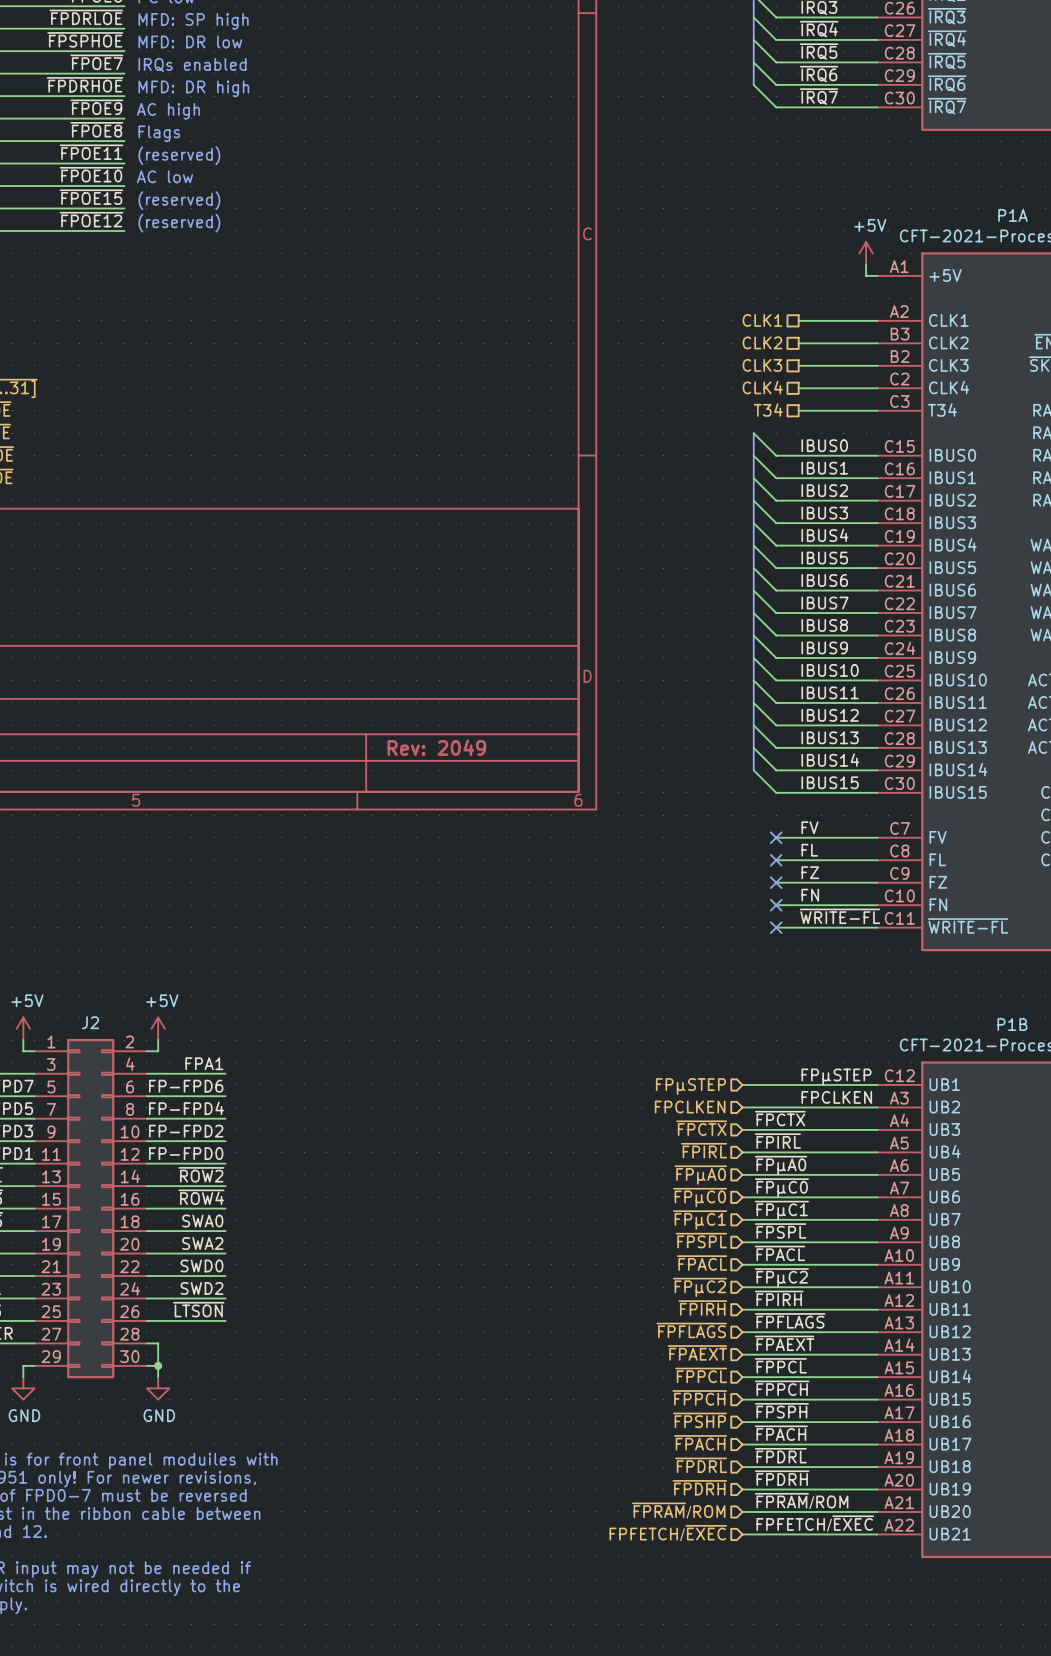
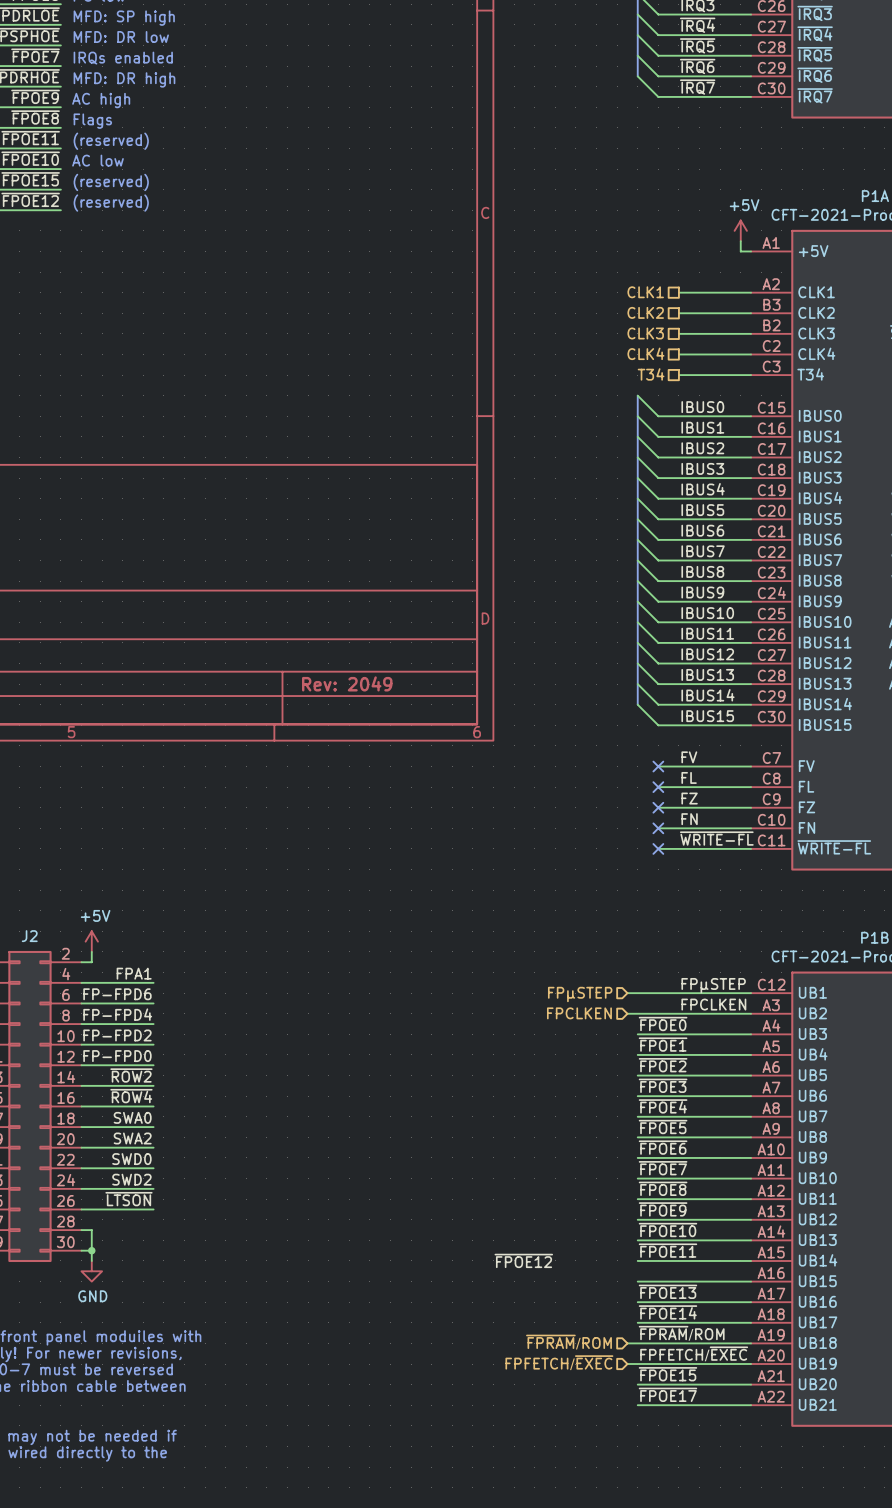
label: ~{FPCTX} (780, 1118) -> ~{FPOE0} (663, 1023)
hierarchical label: ~{FPCTX} (701, 1128) -> none
wire: (742, 1129) (753, 1129) -> none
label: ~{FPIRL} (777, 1141) -> ~{FPOE1} (663, 1044)
hierarchical label: ~{FPIRL} (704, 1150) -> none
wire: (742, 1152) (753, 1152) -> none
label: ~{FPµA0} (781, 1165) -> ~{FPOE2} (663, 1065)
wire: (742, 1174) (753, 1174) -> none
hierarchical label: ~{FPµA0} (700, 1175) -> none
label: ~{FPµC0} (781, 1187) -> ~{FPOE3} (663, 1085)
hierarchical label: ~{FPµC0} (700, 1197) -> none
wire: (742, 1197) (753, 1197) -> none
label: ~{FPµC1} (781, 1210) -> ~{FPOE4} (663, 1106)
hierarchical label: ~{FPµC1} (700, 1219) -> none
wire: (742, 1219) (753, 1219) -> none
label: ~{FPSPL} (780, 1230) -> ~{FPOE5} (663, 1127)
hierarchical label: ~{FPSPL} (701, 1240) -> none
wire: (742, 1242) (753, 1242) -> none
label: ~{FPACL} (780, 1253) -> ~{FPOE6} (663, 1147)
hierarchical label: ~{FPACL} (701, 1263) -> none
wire: (742, 1264) (753, 1264) -> none
label: ~{FPµC2} (781, 1277) -> ~{FPOE7} (663, 1168)
hierarchical label: ~{FPµC2} (700, 1287) -> none
wire: (742, 1287) (753, 1287) -> none
label: ~{FPIRH} (779, 1298) -> ~{FPOE8} (663, 1188)
hierarchical label: ~{FPIRH} (702, 1308) -> none
wire: (742, 1309) (753, 1309) -> none
label: ~{FPFLAGS} (790, 1320) -> ~{FPOE9} (663, 1209)
hierarchical label: ~{FPFLAGS} (691, 1330) -> none
wire: (742, 1332) (753, 1332) -> none
label: ~{FPAEXT} (784, 1343) -> ~{FPOE10} (667, 1230)
hierarchical label: ~{FPAEXT} (697, 1352) -> none
wire: (742, 1354) (753, 1354) -> none
label: ~{FPPCL} (780, 1365) -> ~{FPOE11} (667, 1250)
hierarchical label: ~{FPPCL} (701, 1375) -> none
label: none -> ~{FPOE12} (523, 1260)
wire: (742, 1377) (753, 1377) -> none
label: ~{FPPCH} (782, 1388) -> none
hierarchical label: ~{FPPCH} (699, 1397) -> none
wire: (742, 1399) (753, 1399) -> none
label: ~{FPSPH} (781, 1410) -> ~{FPOE13} (667, 1291)
hierarchical label: ~{FPSHP} (700, 1420) -> none
wire: (742, 1422) (753, 1422) -> none
label: ~{FPACH} (781, 1433) -> ~{FPOE14} (667, 1312)
hierarchical label: ~{FPACH} (700, 1442) -> none
wire: (742, 1444) (753, 1444) -> none
label: ~{FPDRL} (780, 1455) -> ~{FPRAM}∕ROM (681, 1333)
hierarchical label: ~{FPDRL} (701, 1465) -> ~{FPRAM}∕ROM (569, 1342)
label: ~{FPDRH} (782, 1478) -> FPFETCH∕~{EXEC} (694, 1354)
hierarchical label: ~{FPDRH} (699, 1487) -> FPFETCH∕~{EXEC} (559, 1363)
label: ~{FPRAM}∕ROM (801, 1501) -> ~{FPOE15} (667, 1374)
hierarchical label: ~{FPRAM}∕ROM (678, 1510) -> none
wire: (742, 1511) (753, 1511) -> none
label: FPFETCH∕~{EXEC} (815, 1523) -> ~{FPOE17} (667, 1394)
hierarchical label: FPFETCH∕~{EXEC} (668, 1533) -> none
wire: (742, 1534) (753, 1534) -> none

